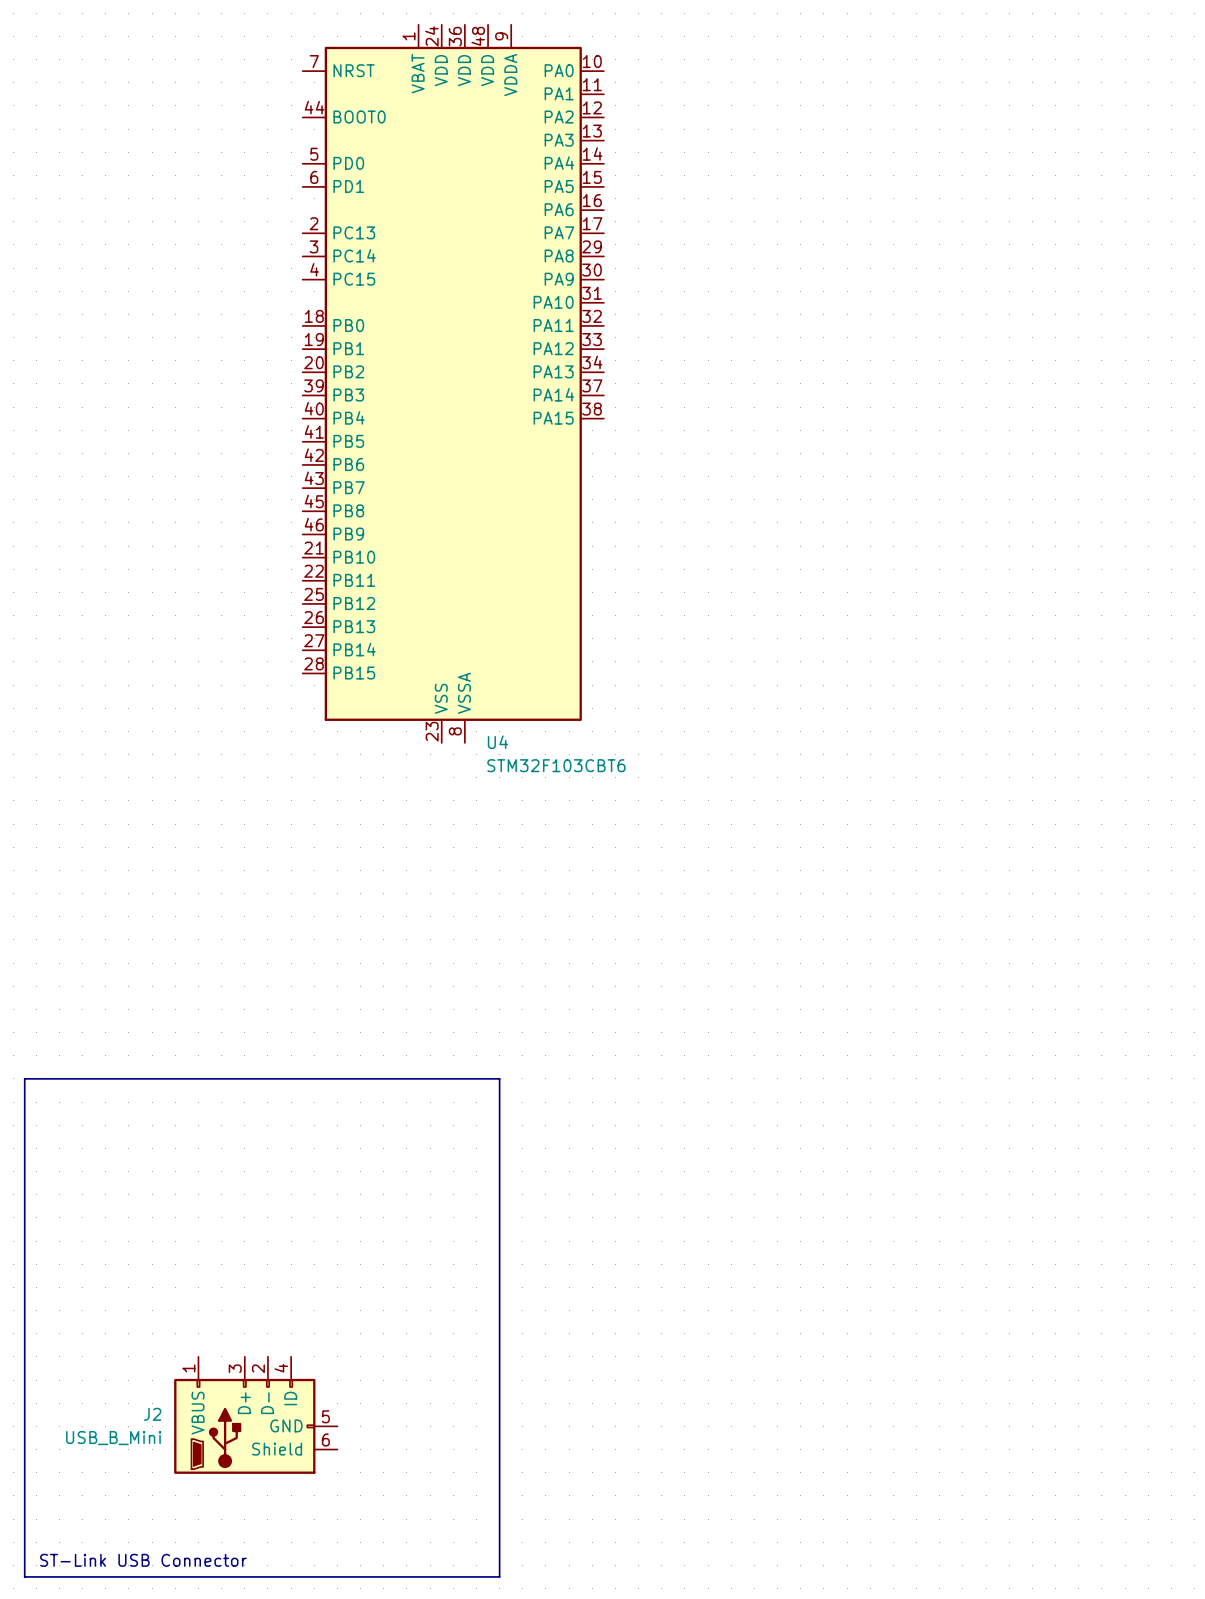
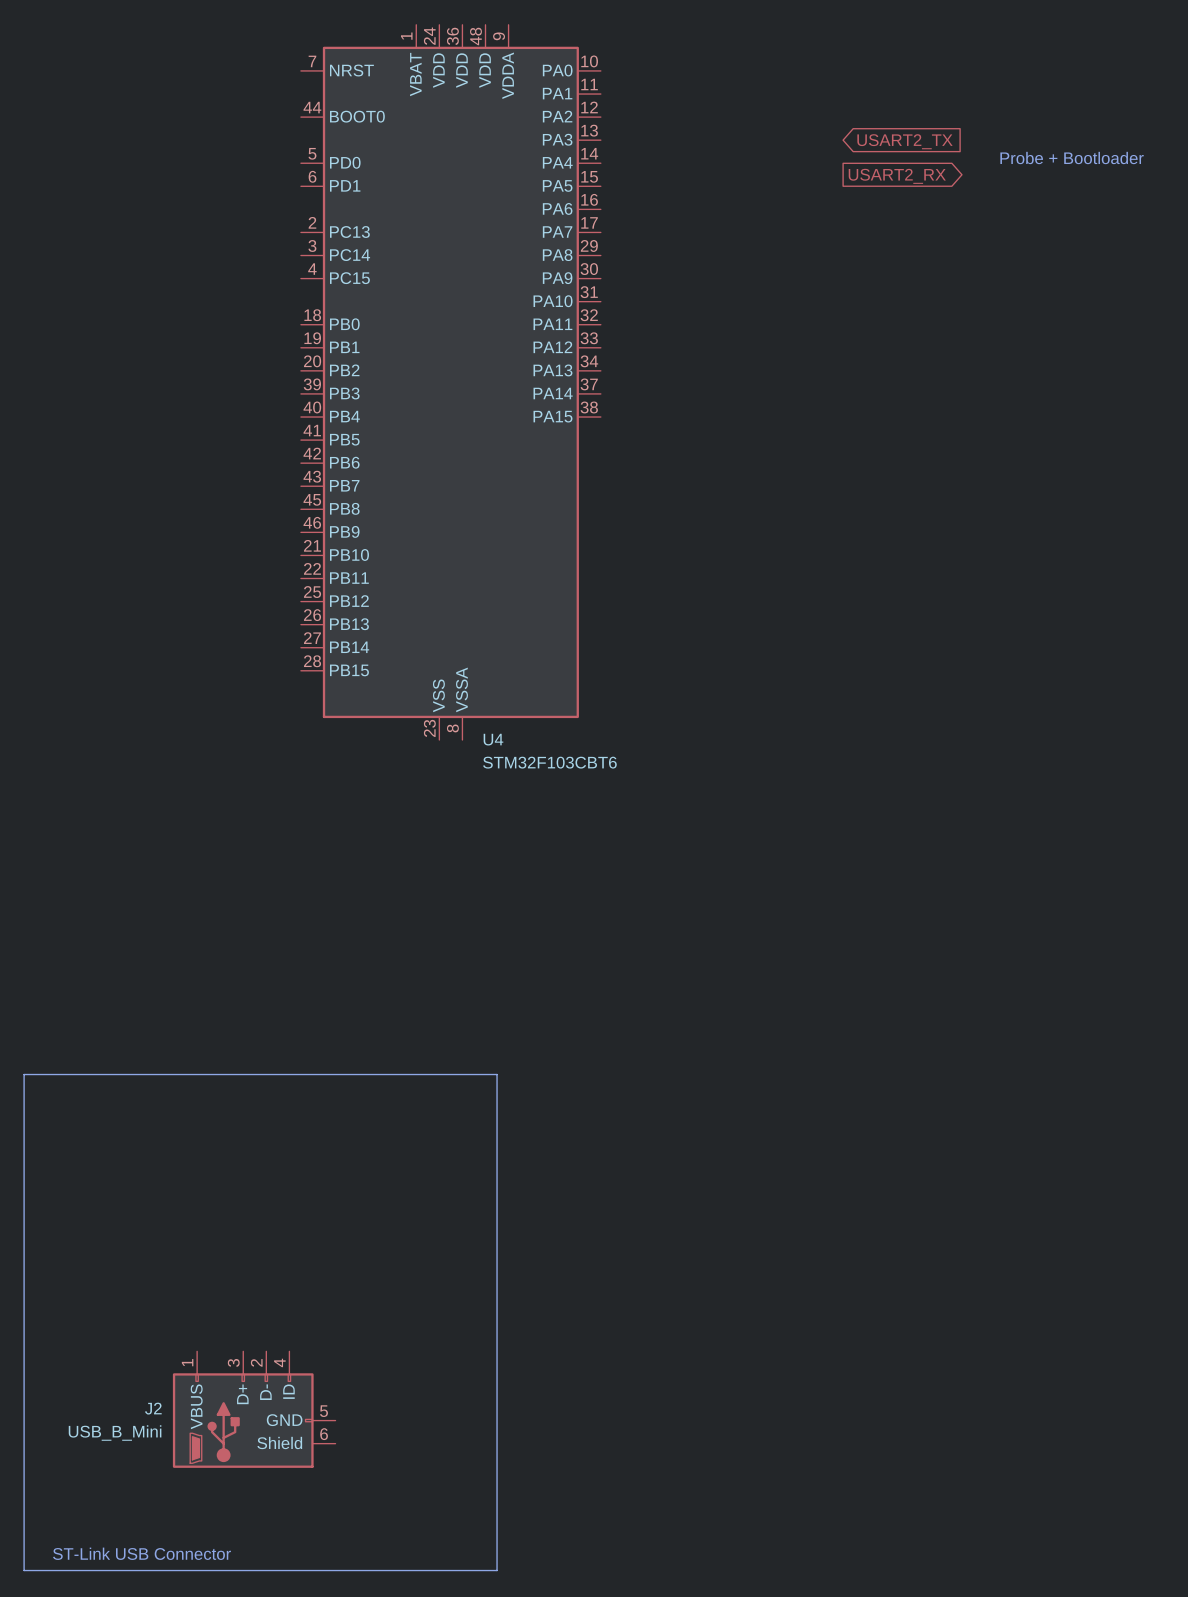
global label: none -> USART2_TX (904, 141)
text: none -> Probe + Bootloader (1072, 158)
global label: none -> USART2_RX (897, 176)

